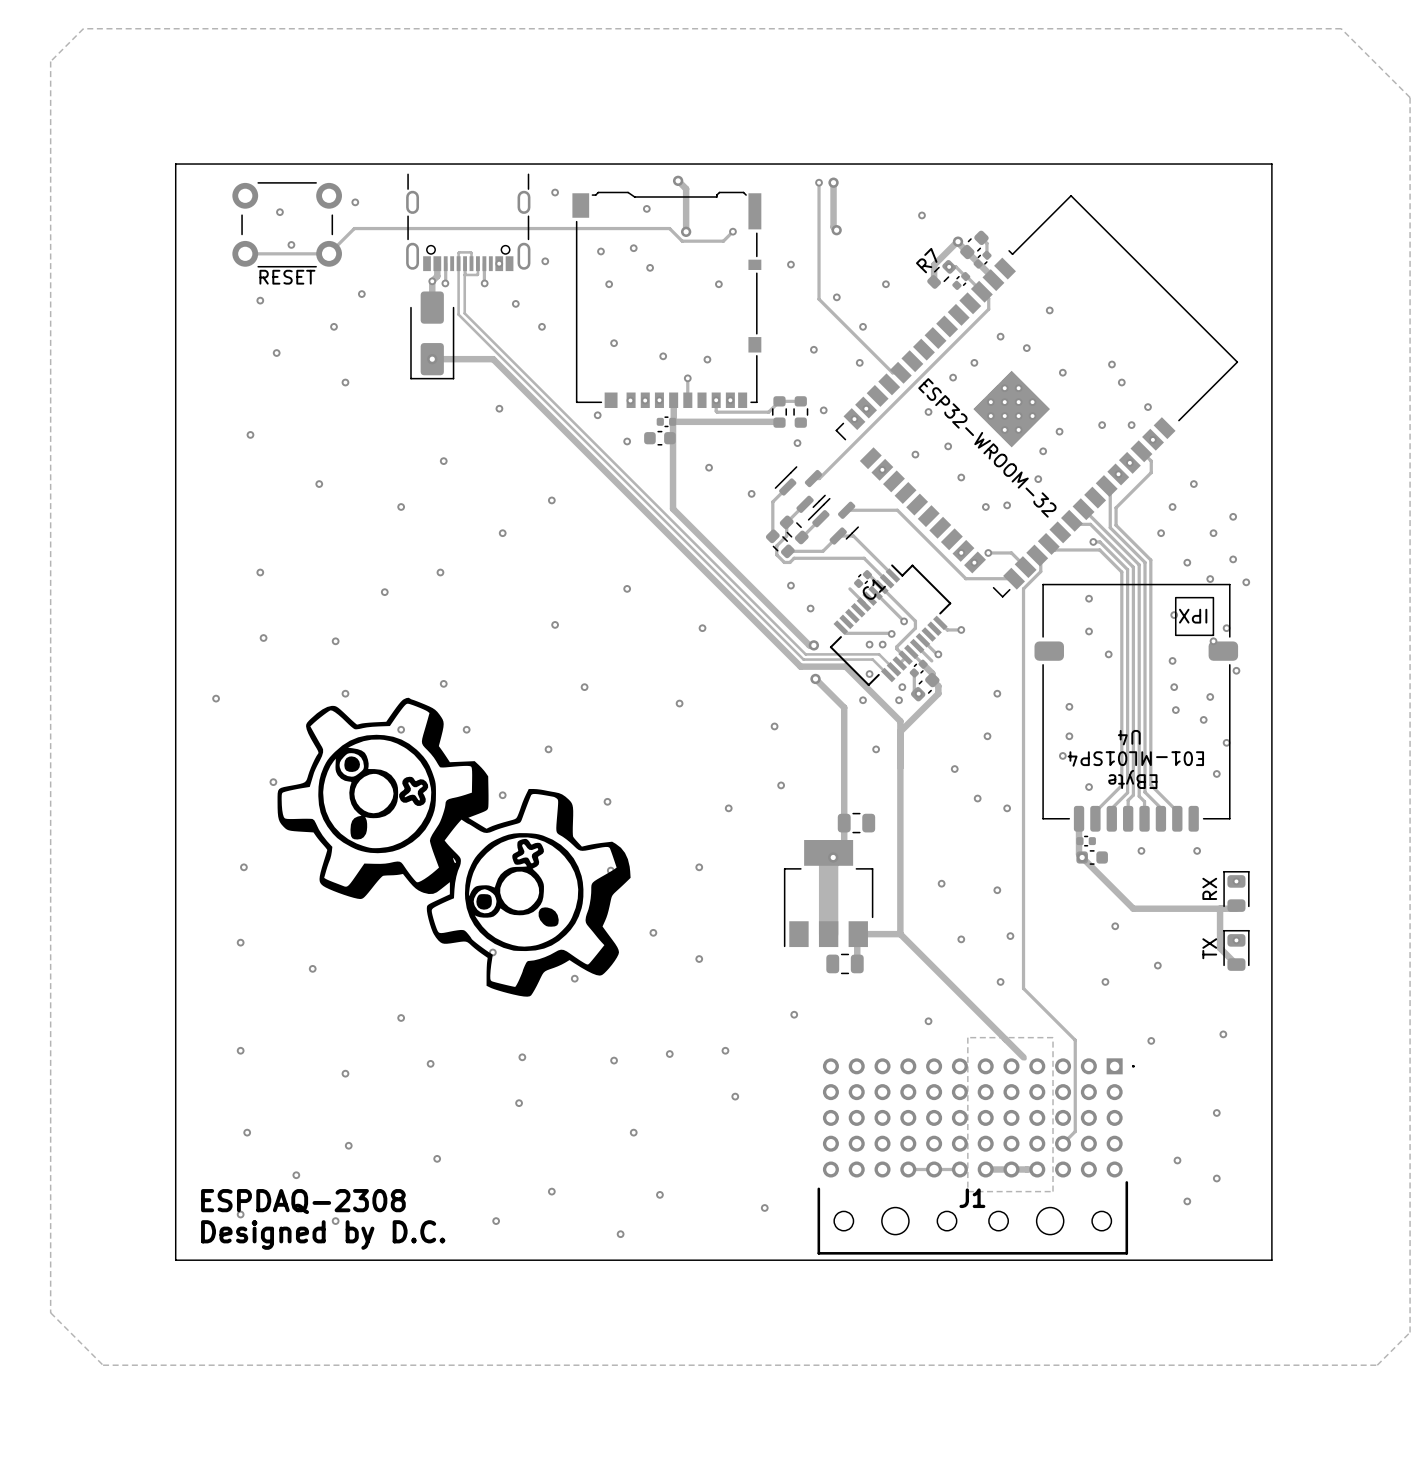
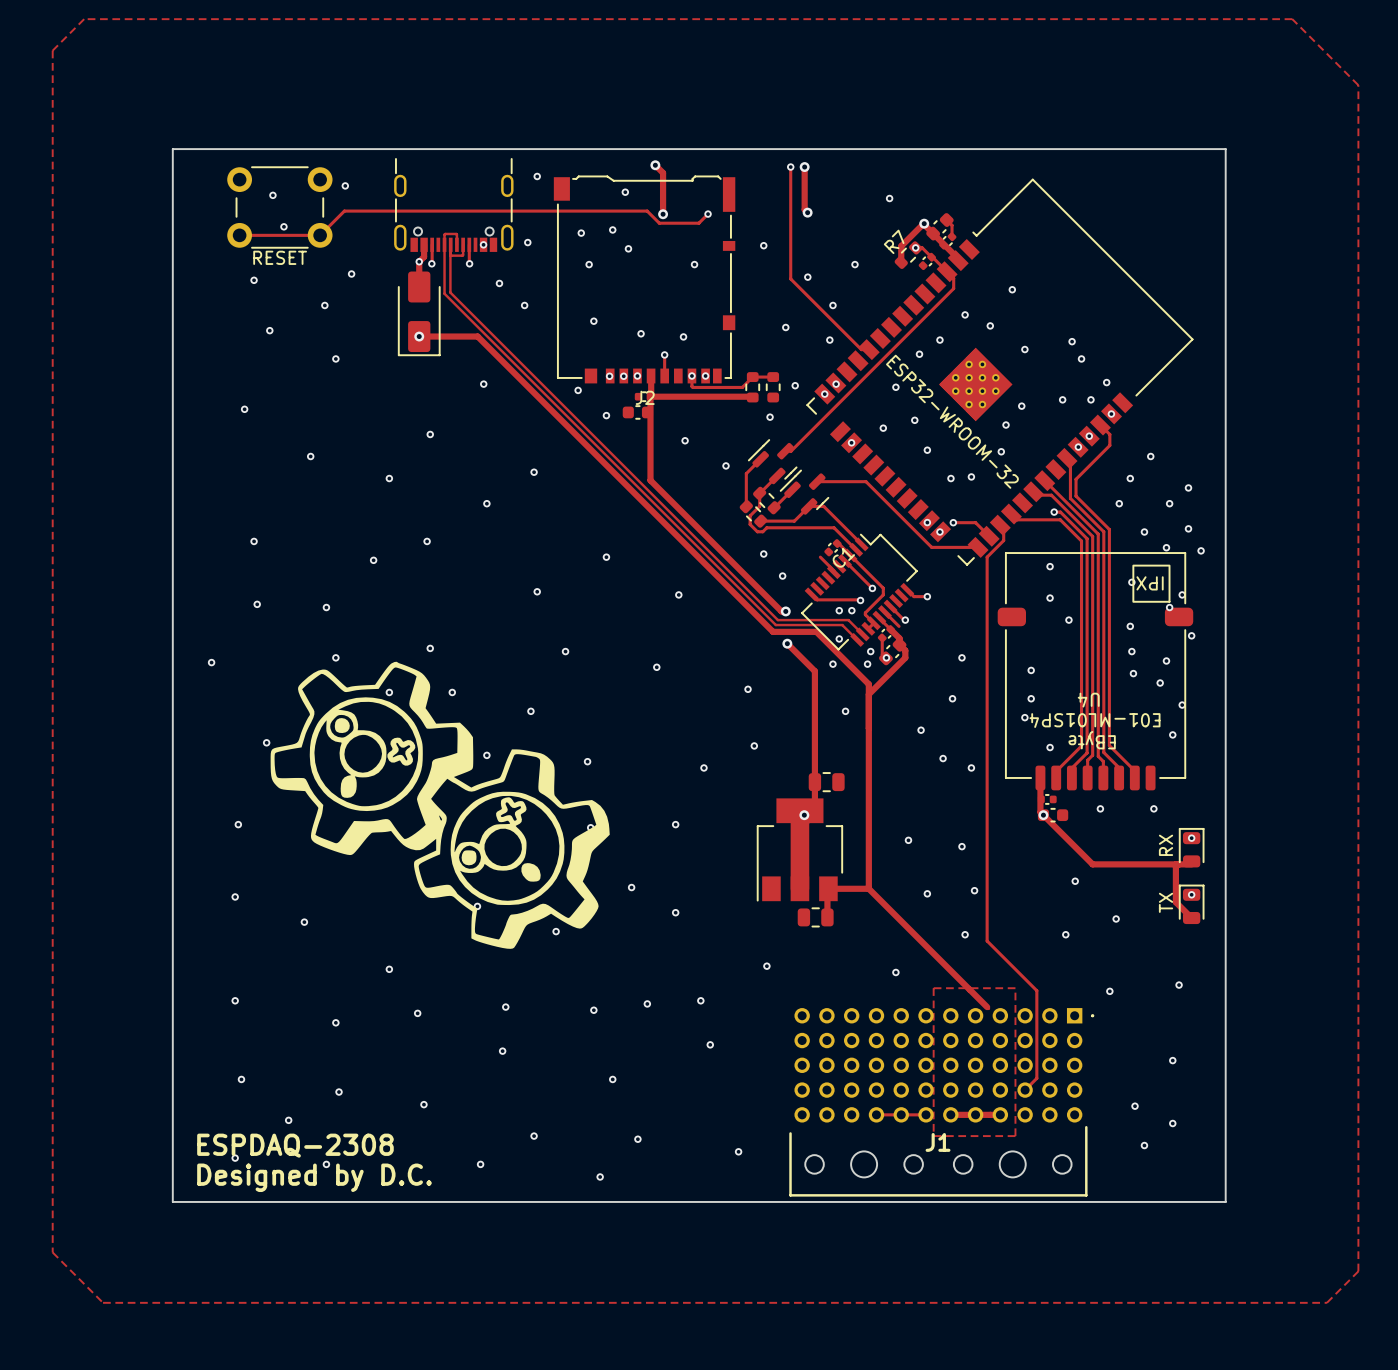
J2 name: none -> J2 (645, 397)

